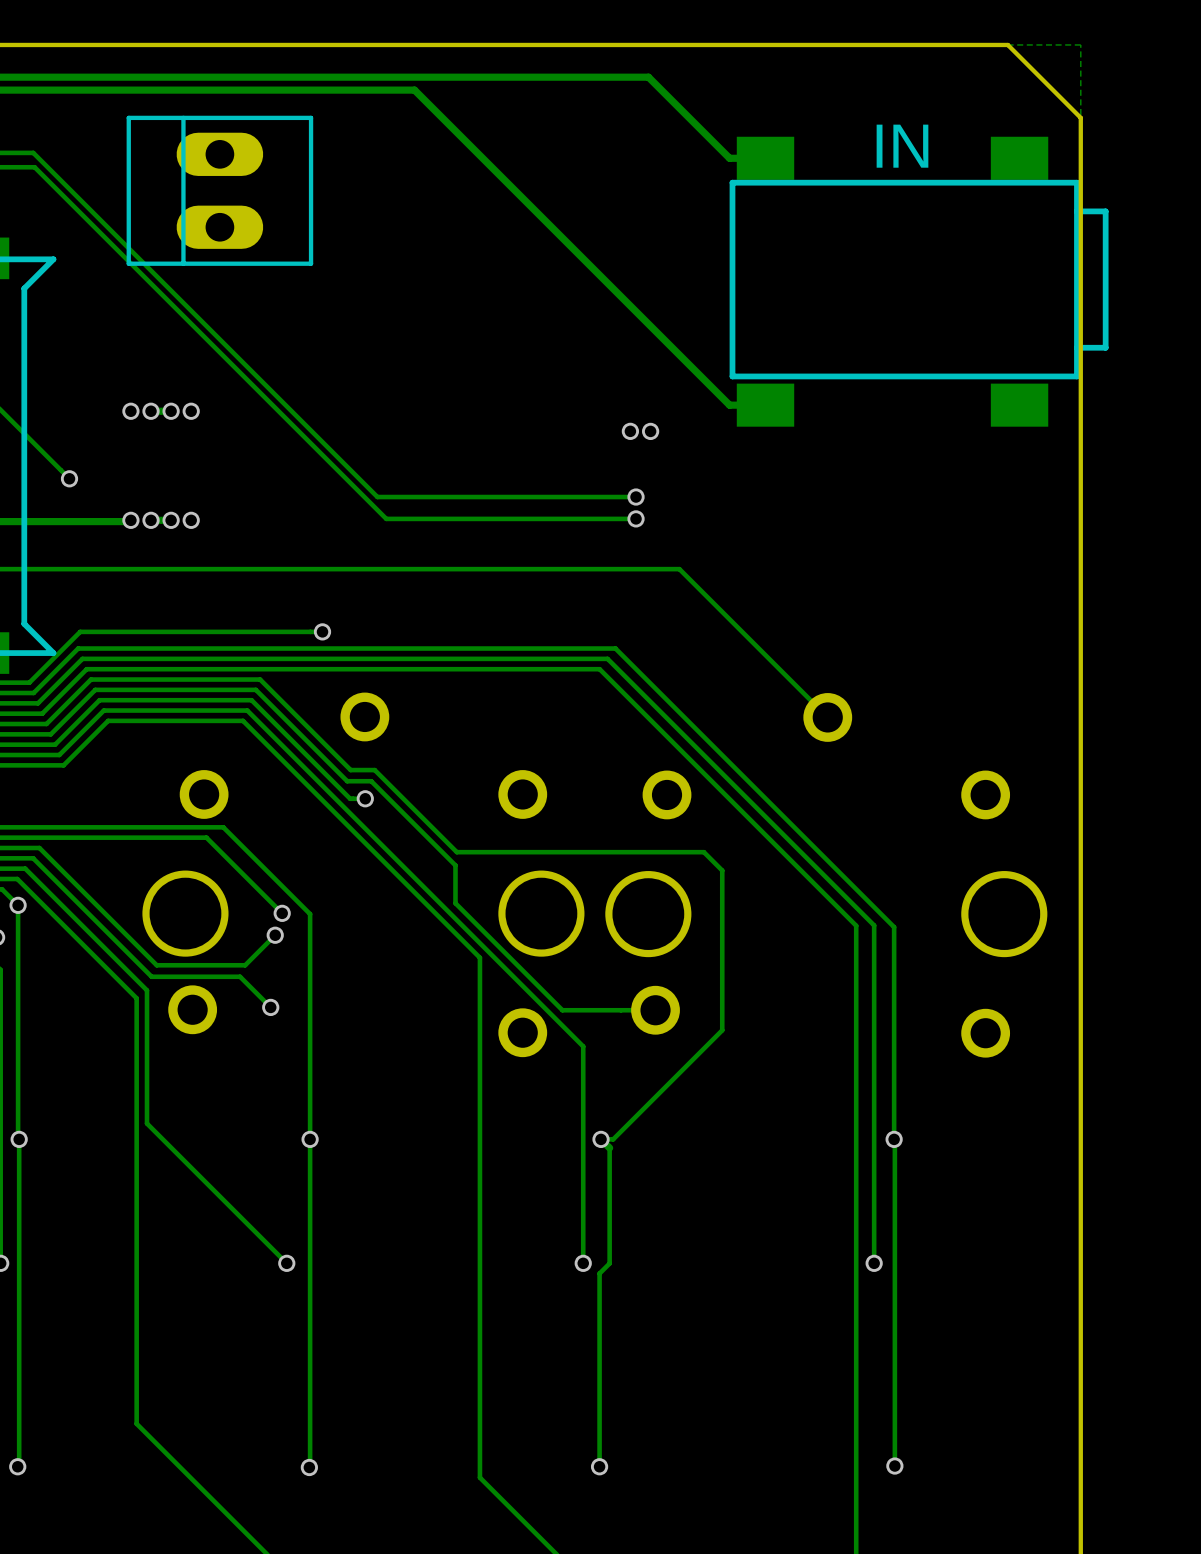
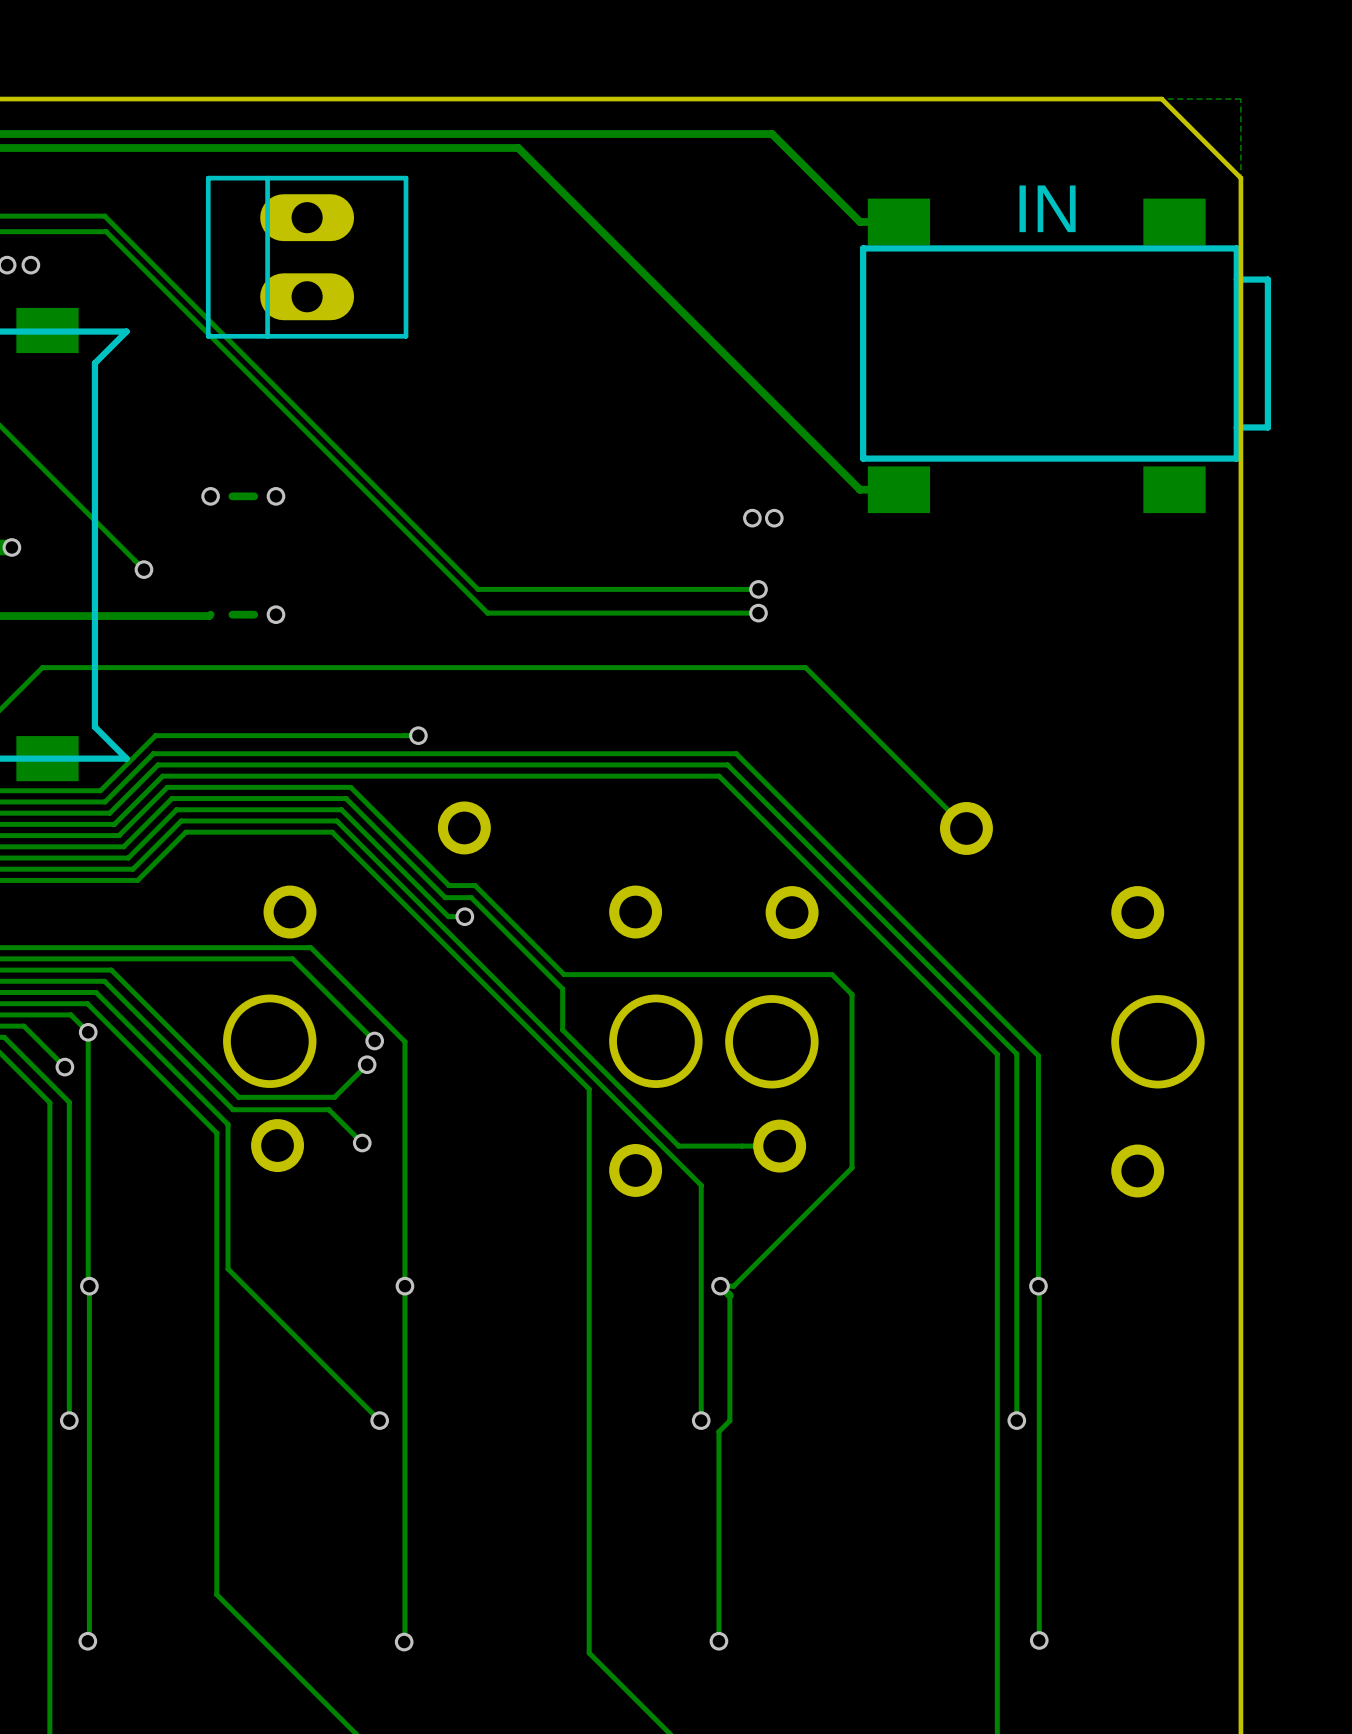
via: (151, 411) -> none
via: (171, 411) -> none
via: (130, 520) -> none
via: (151, 520) -> none
via: (171, 520) -> none

